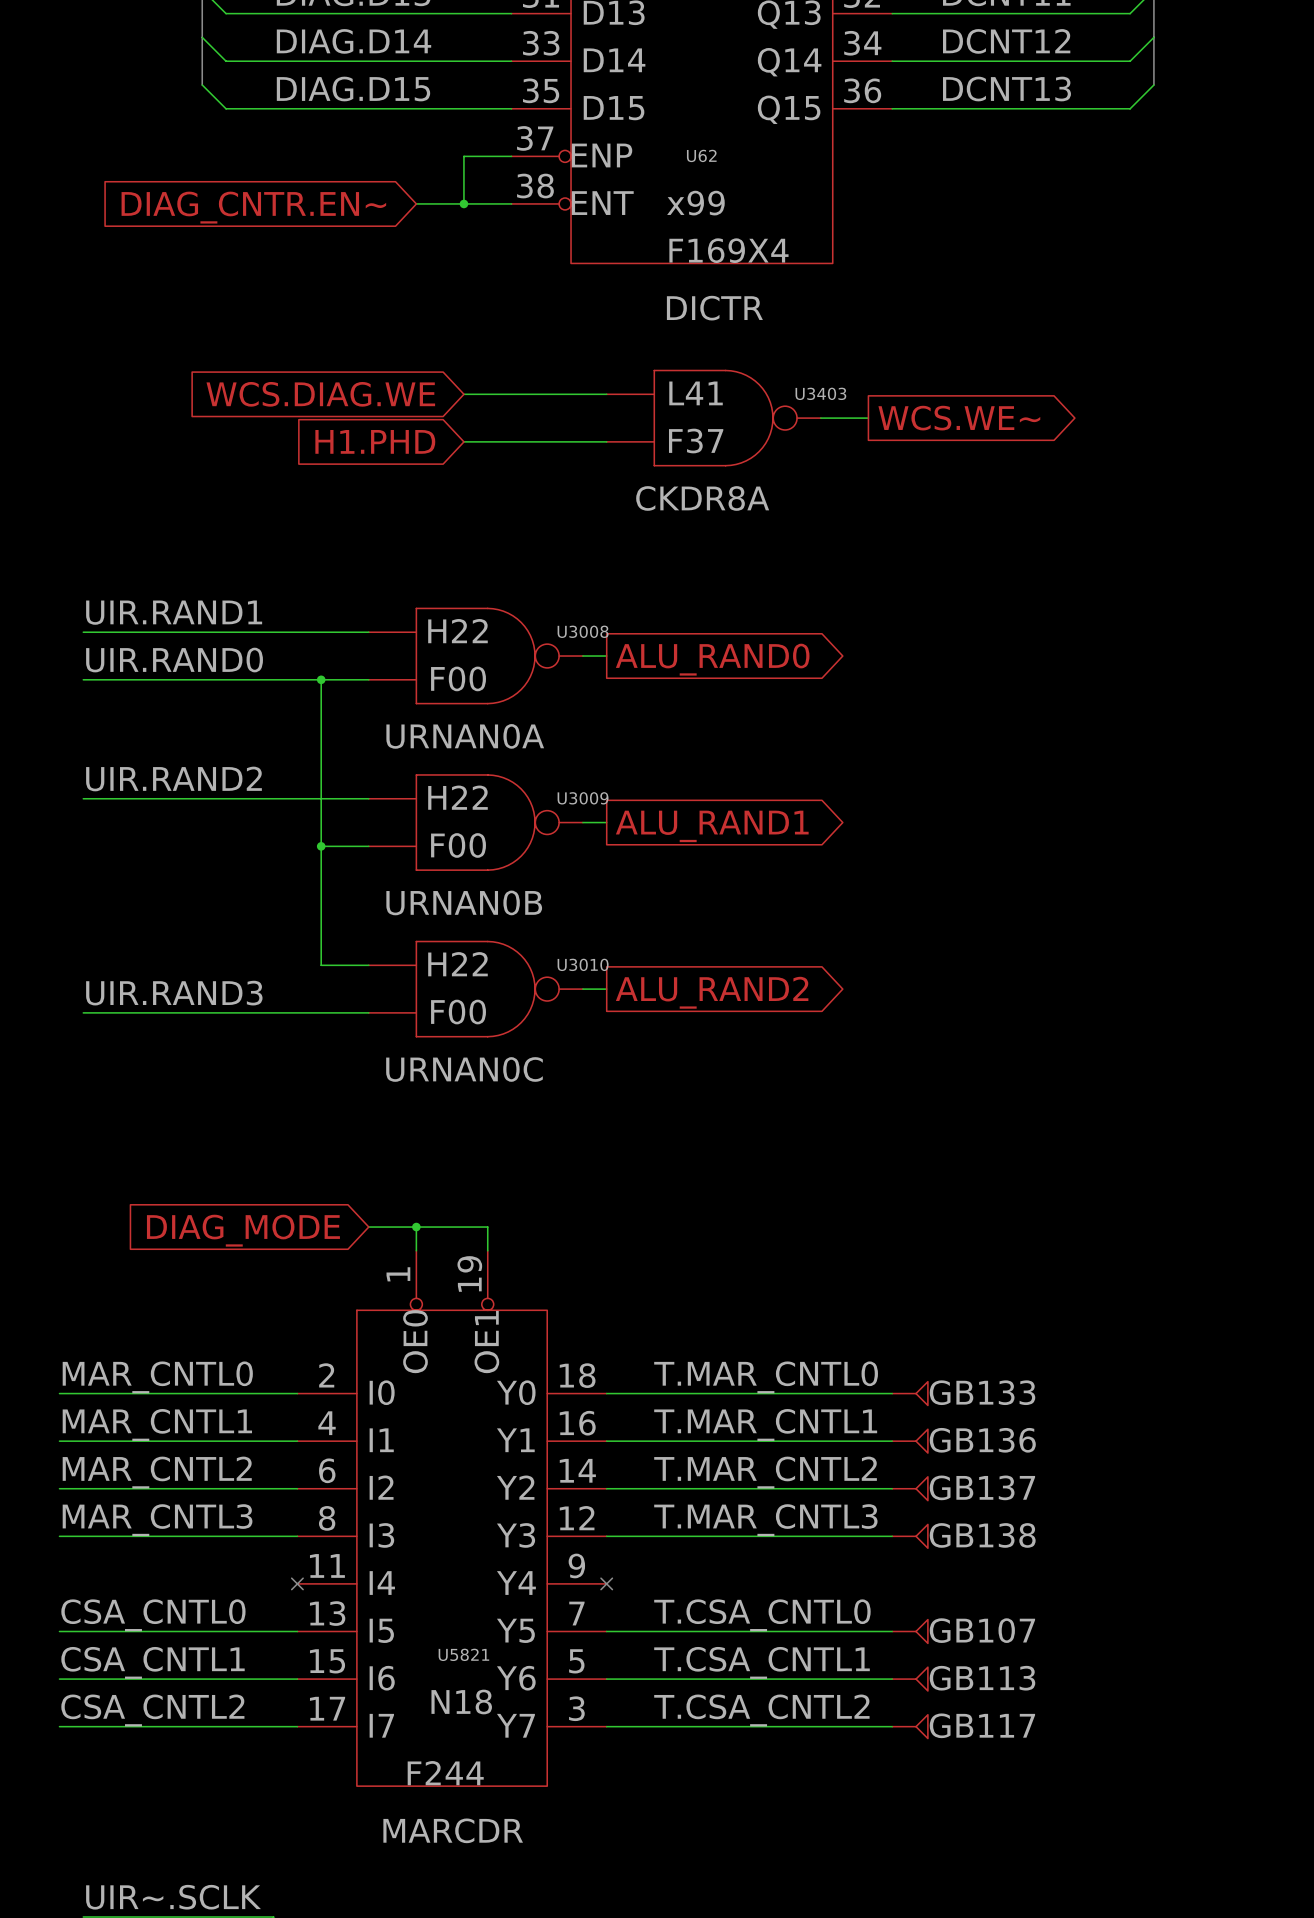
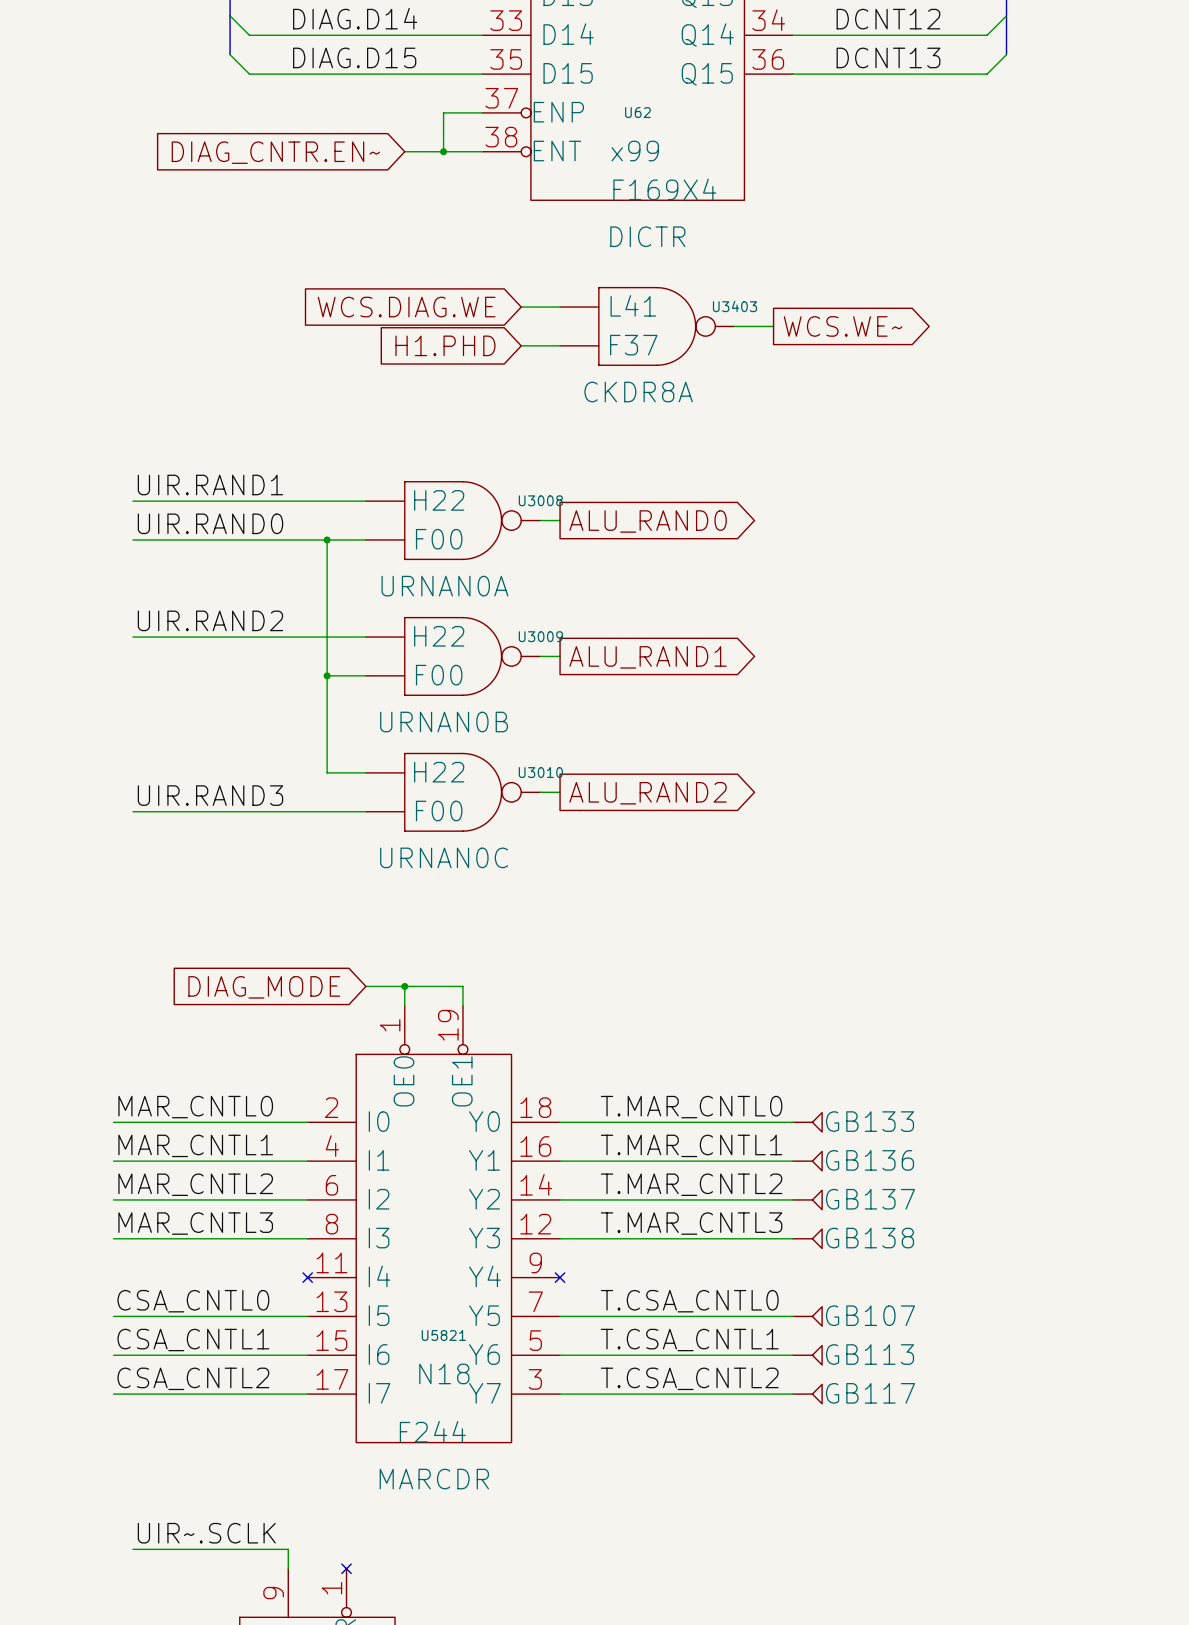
global label position: WCS.DIAG.WE (320, 394) -> WCS.DIAG.WE (406, 307)
wire: (463, 394) (559, 394) -> none
global label position: H1.PHD (375, 441) -> H1.PHD (445, 345)
wire: (463, 441) (559, 441) -> none

